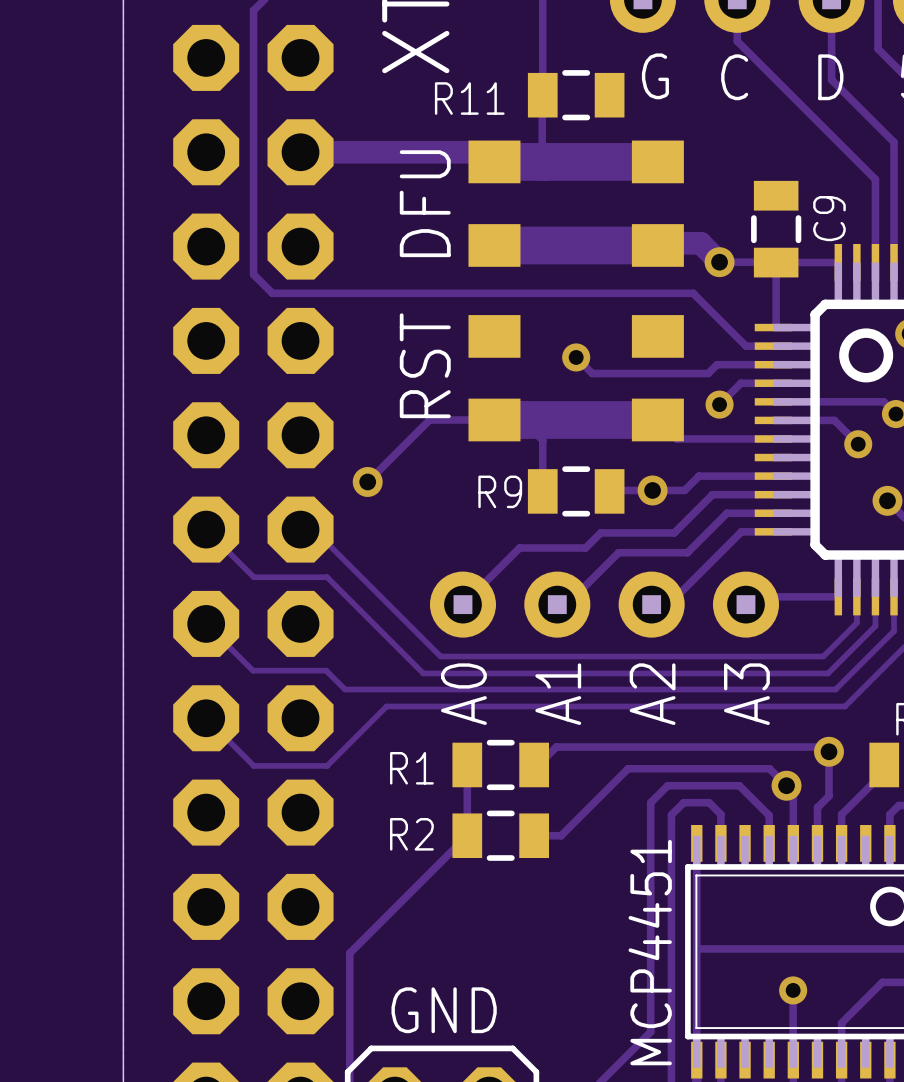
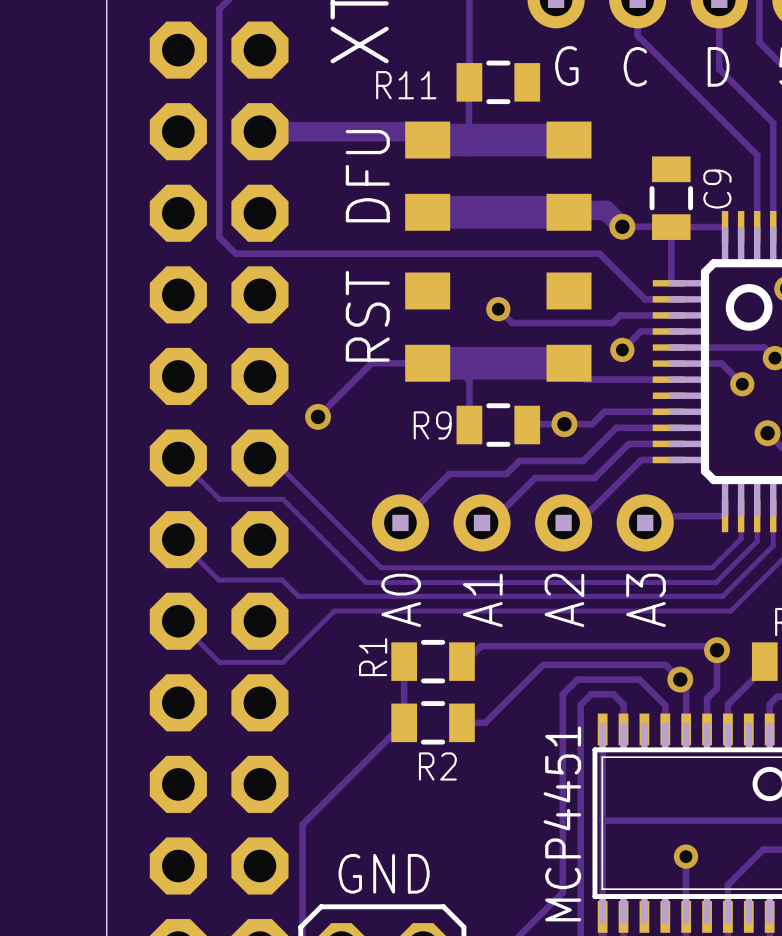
R1 name rotation: 0° (411, 768) -> 90° counterclockwise (373, 657)
R2 name position: R2 (411, 834) -> R2 (437, 766)

